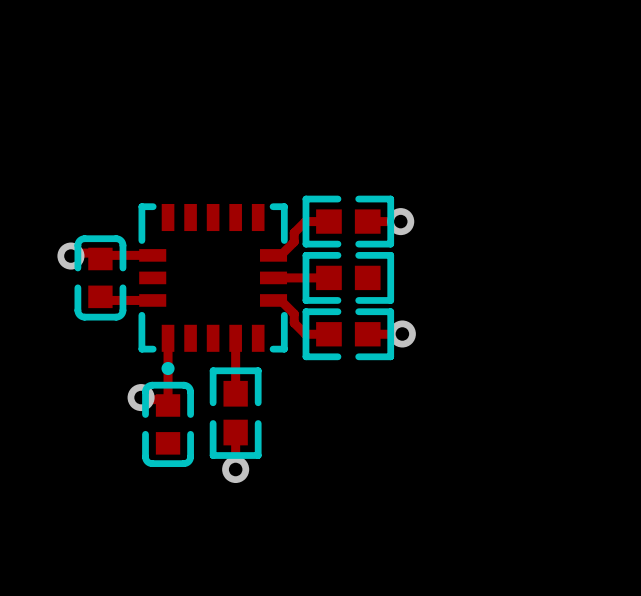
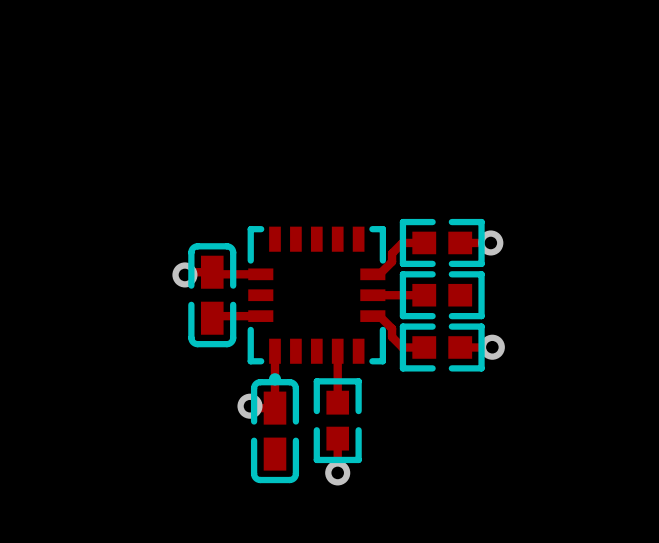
part footprint: [74, 235, 127, 321] -> [188, 243, 237, 348]
part footprint: [142, 381, 194, 468] -> [250, 379, 300, 484]

